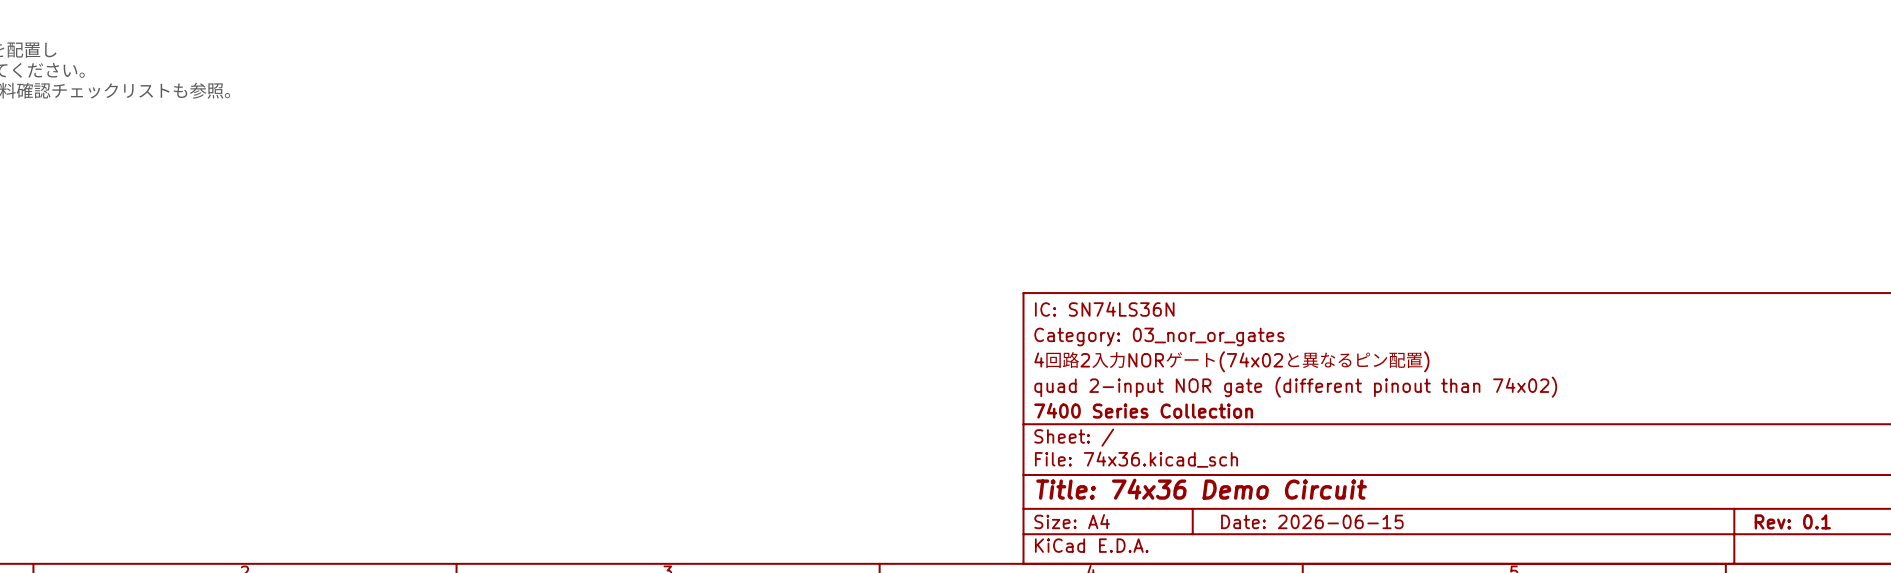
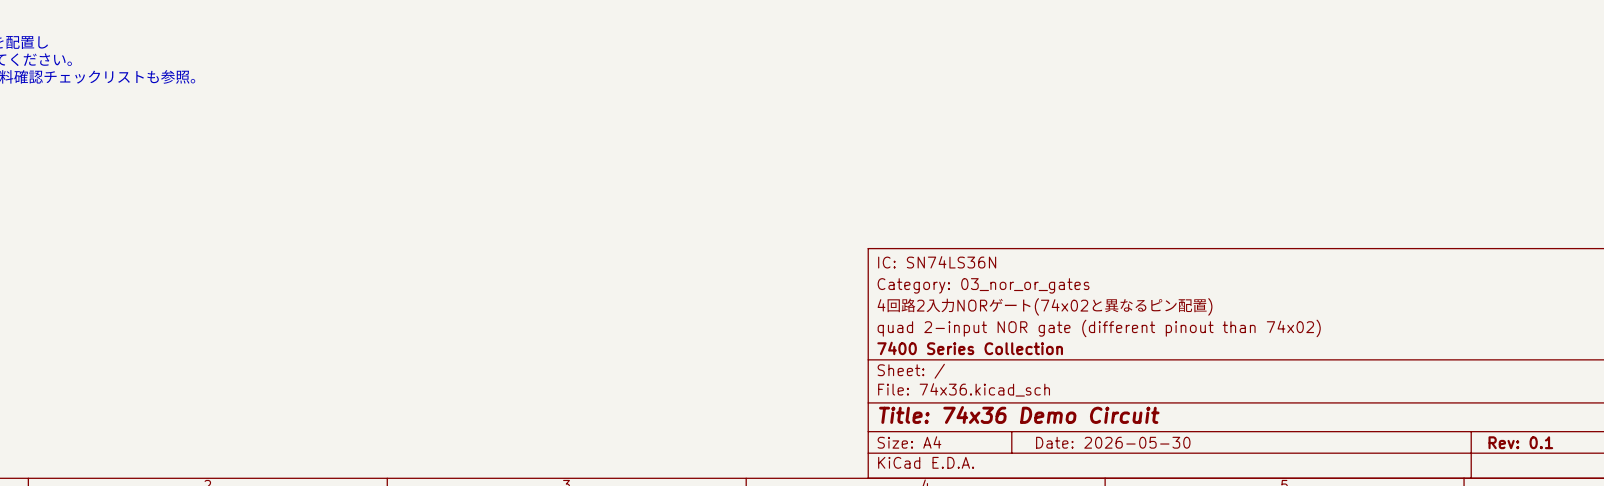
title block: Date: 2026-06-15 (1312, 521) -> Date: 2026-05-30 (1113, 442)

